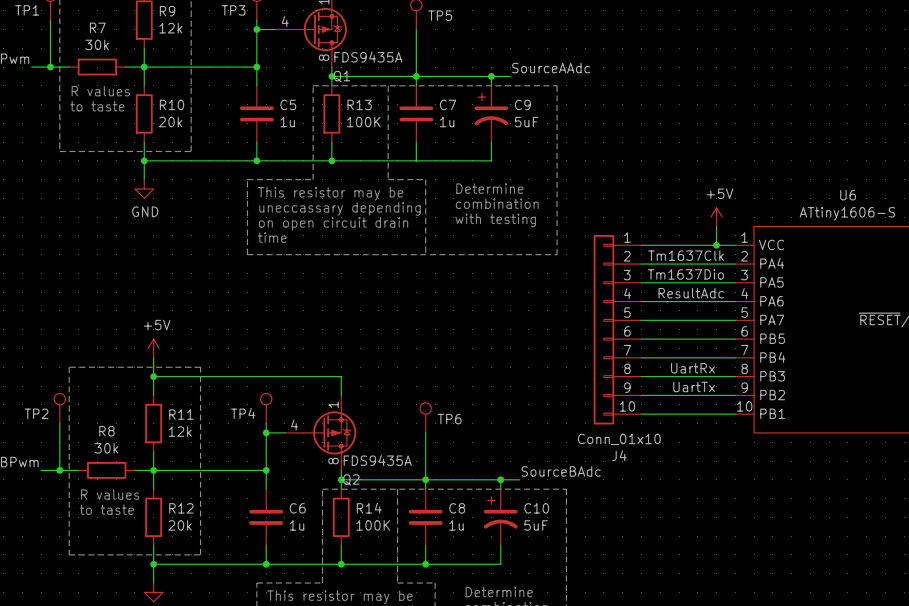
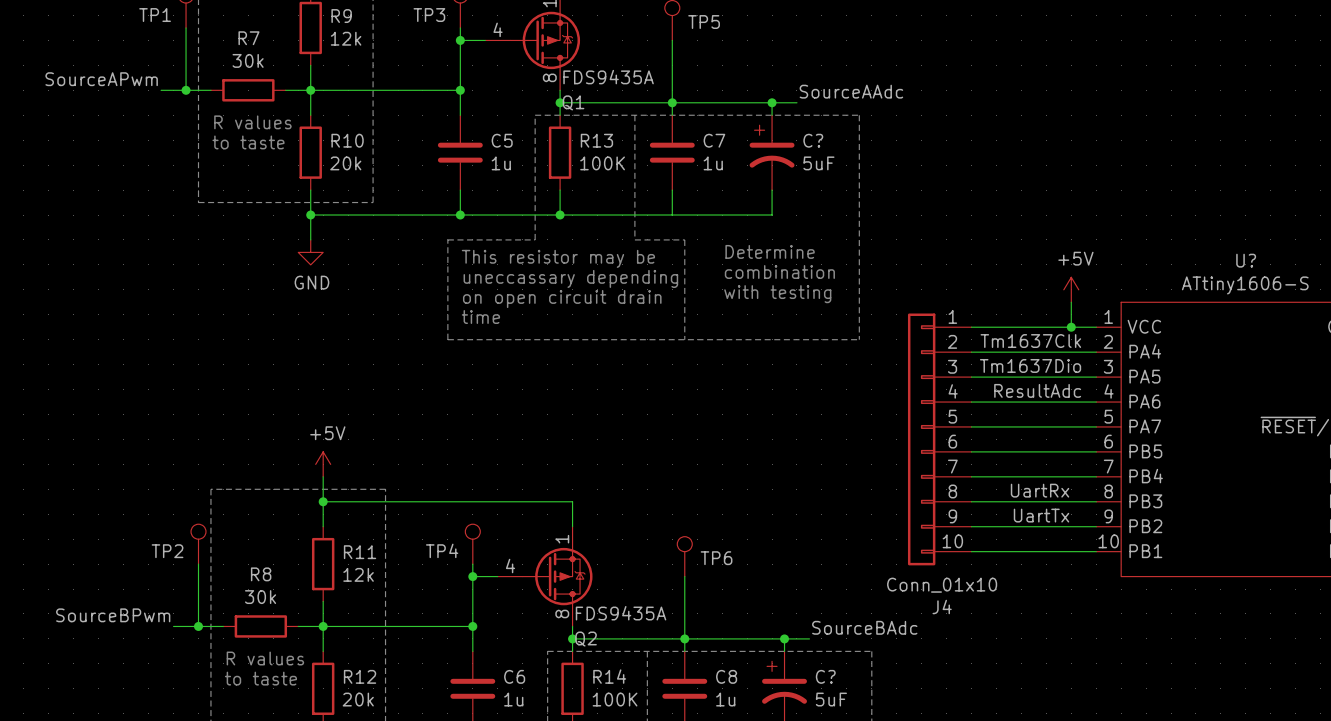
C9 name: C9 (522, 104) -> C? (813, 140)
U6 name: U6 (848, 195) -> U? (1246, 260)
C10 name: C10 (536, 508) -> C? (825, 676)

